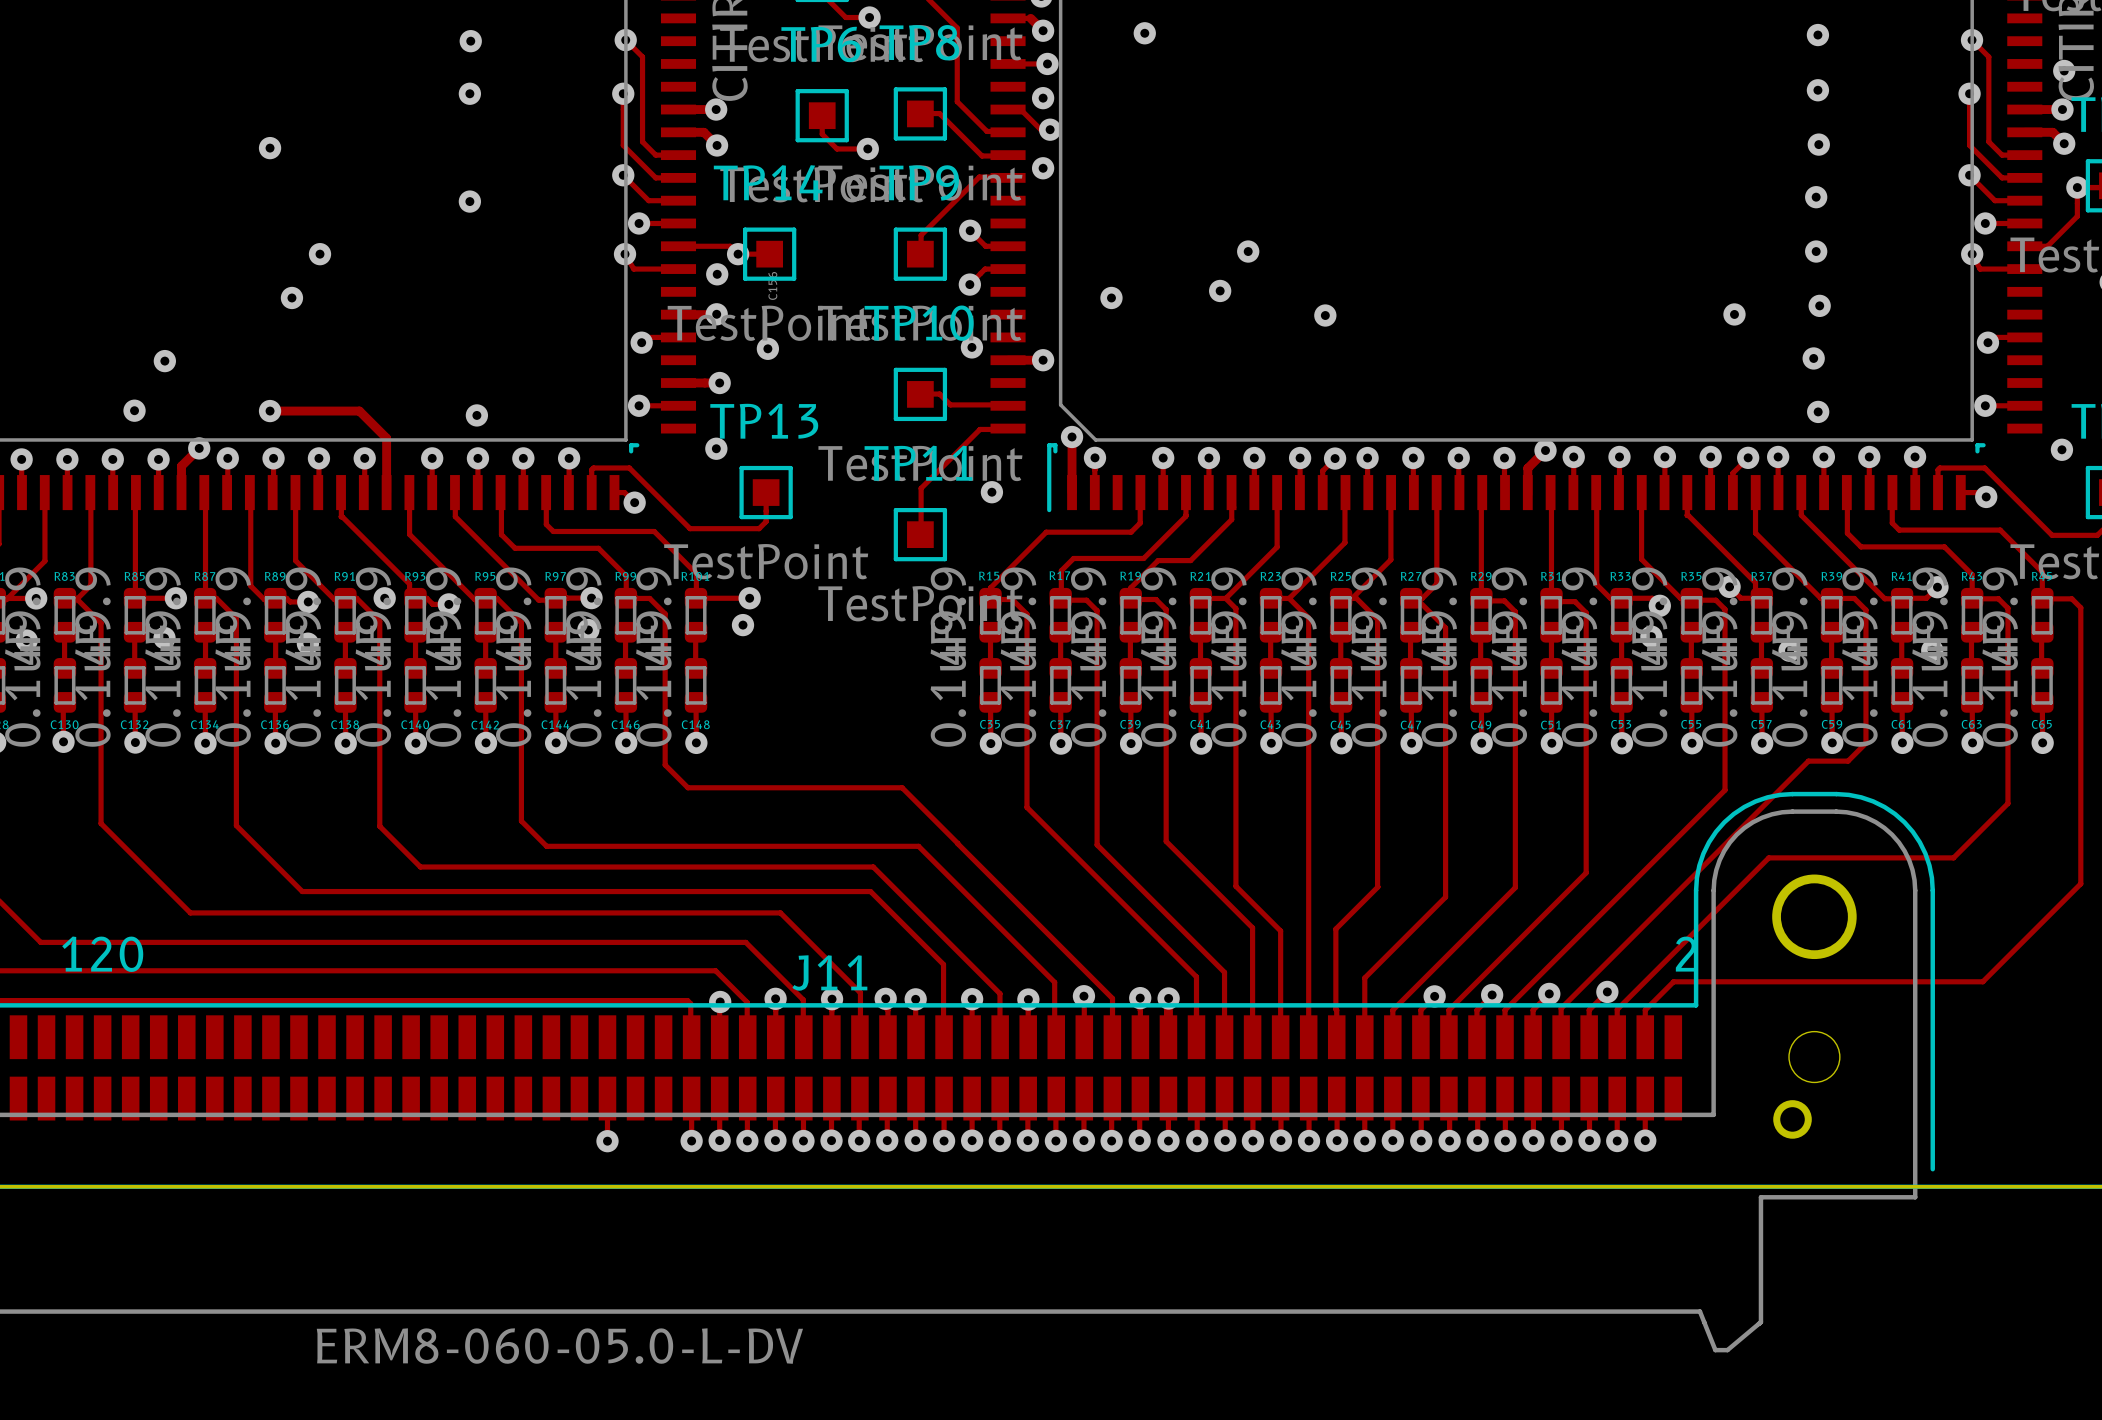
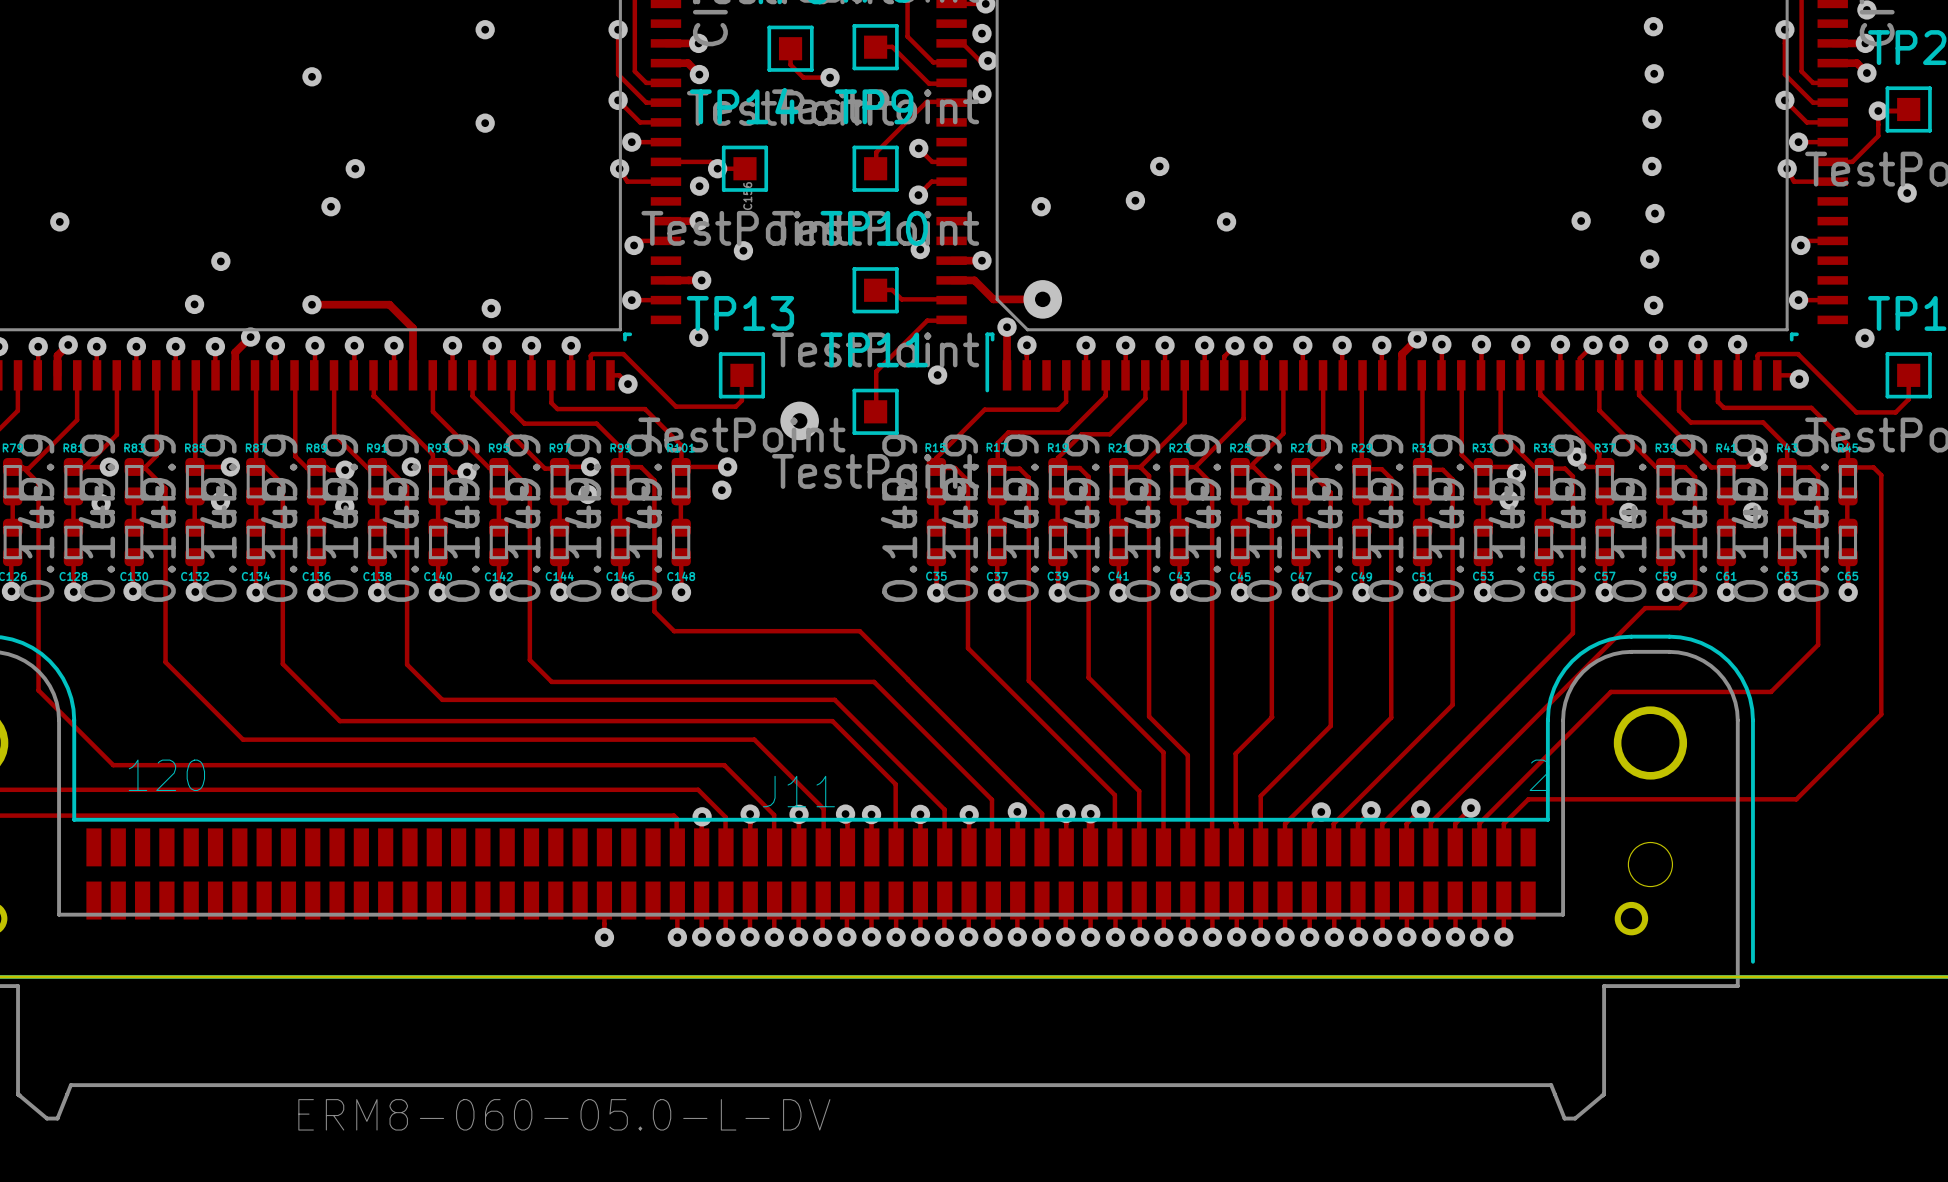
track: none -> (951, 280) (974, 280) (993, 299) (1042, 299)
via: none -> (1042, 299)
via: none -> (799, 420)

